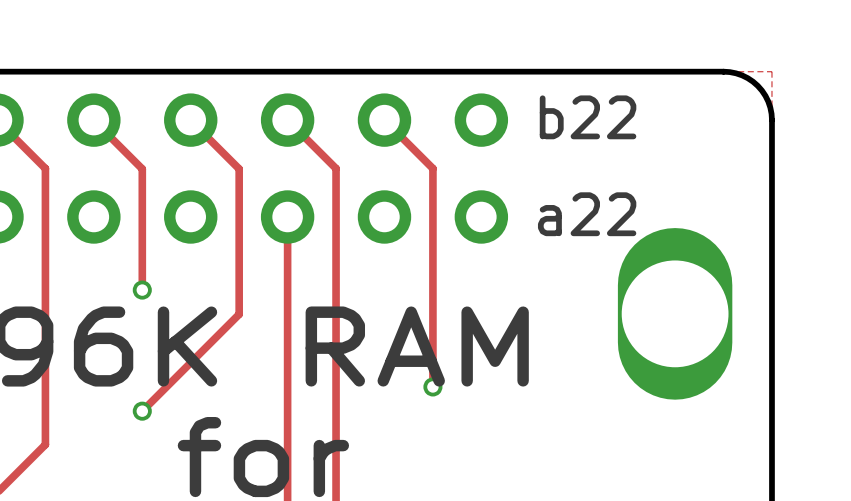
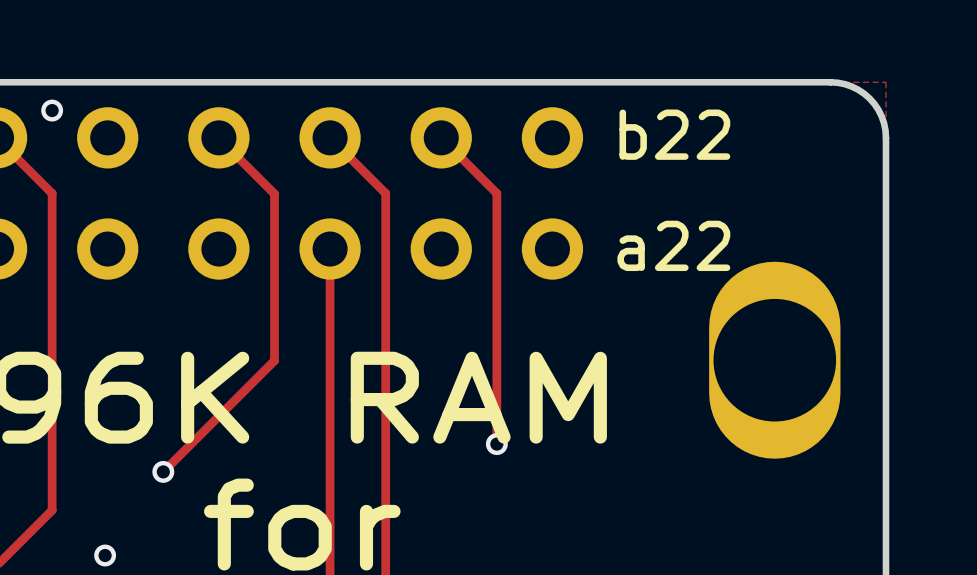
via: none -> (52, 110)
track: (93, 120) (142, 168) (142, 290) -> none
via: (142, 290) -> none
via: none -> (105, 555)

